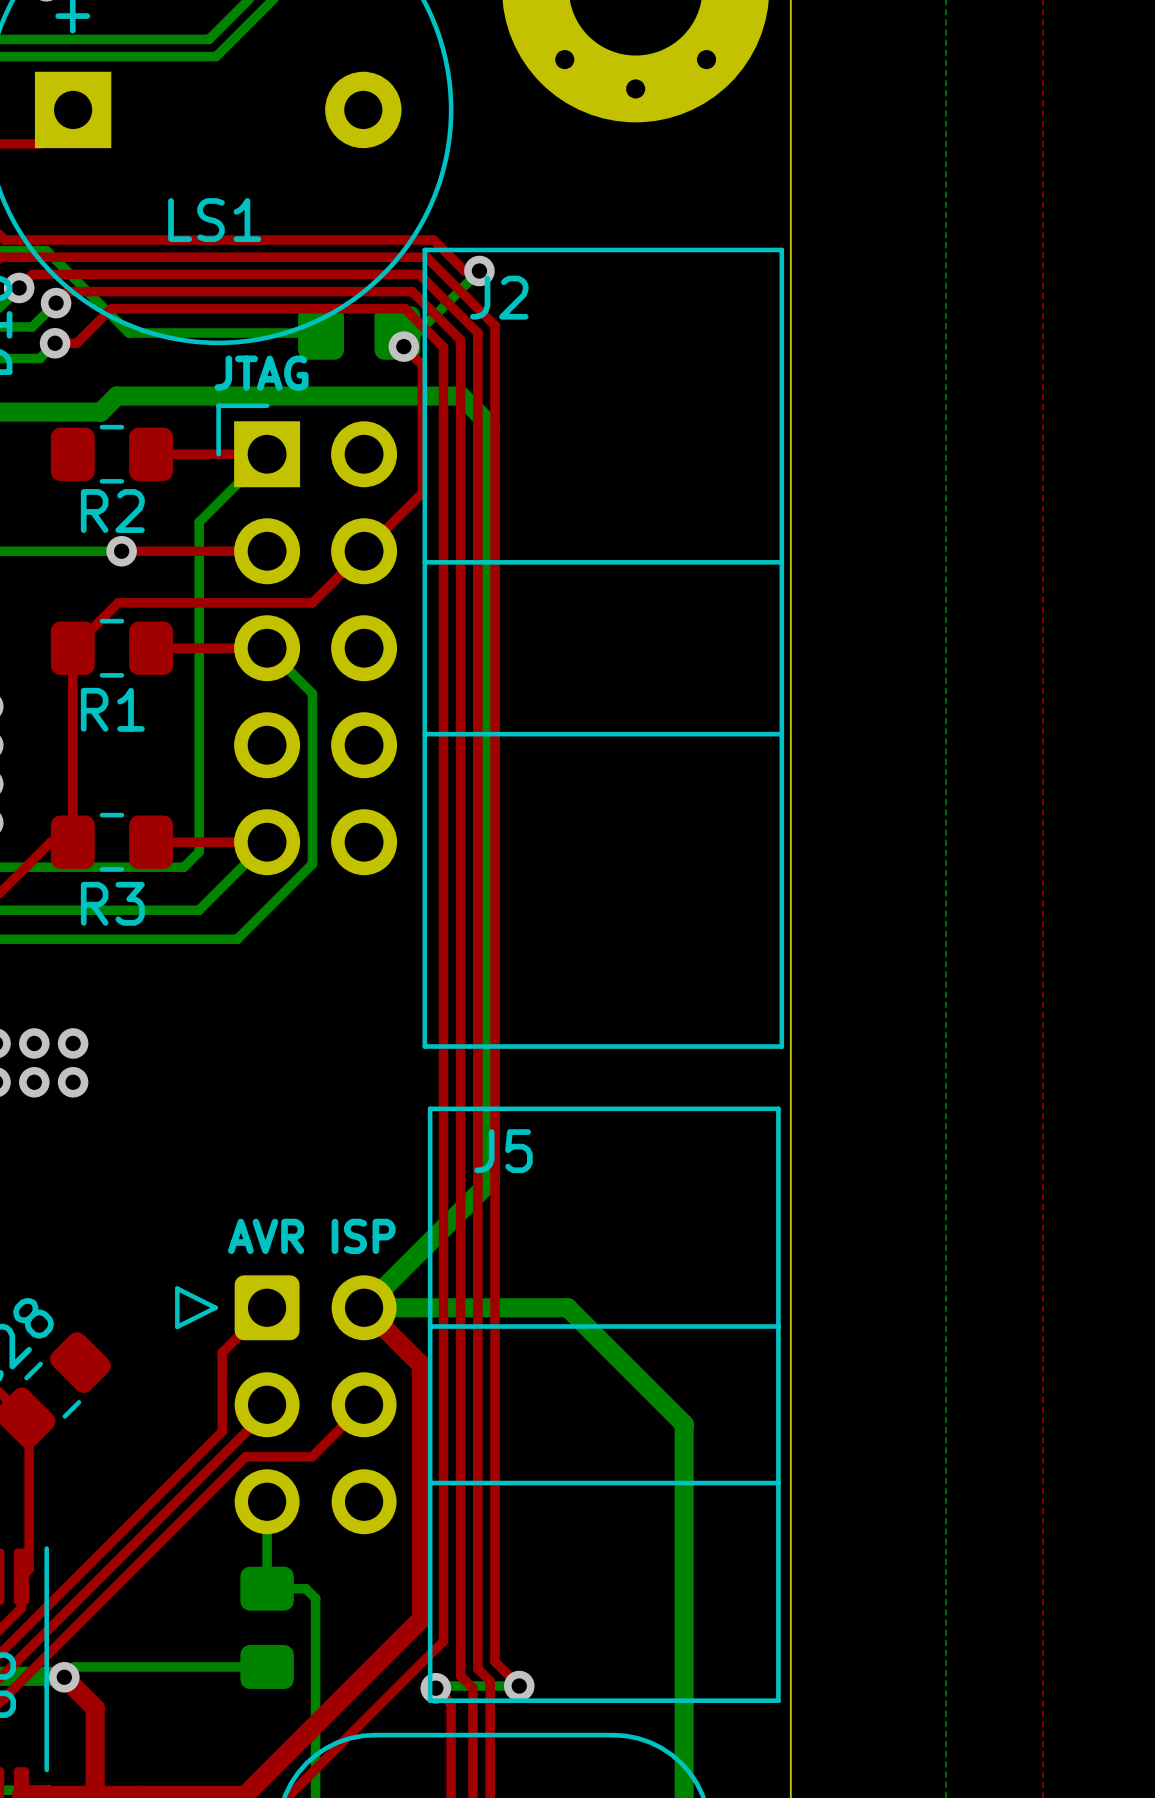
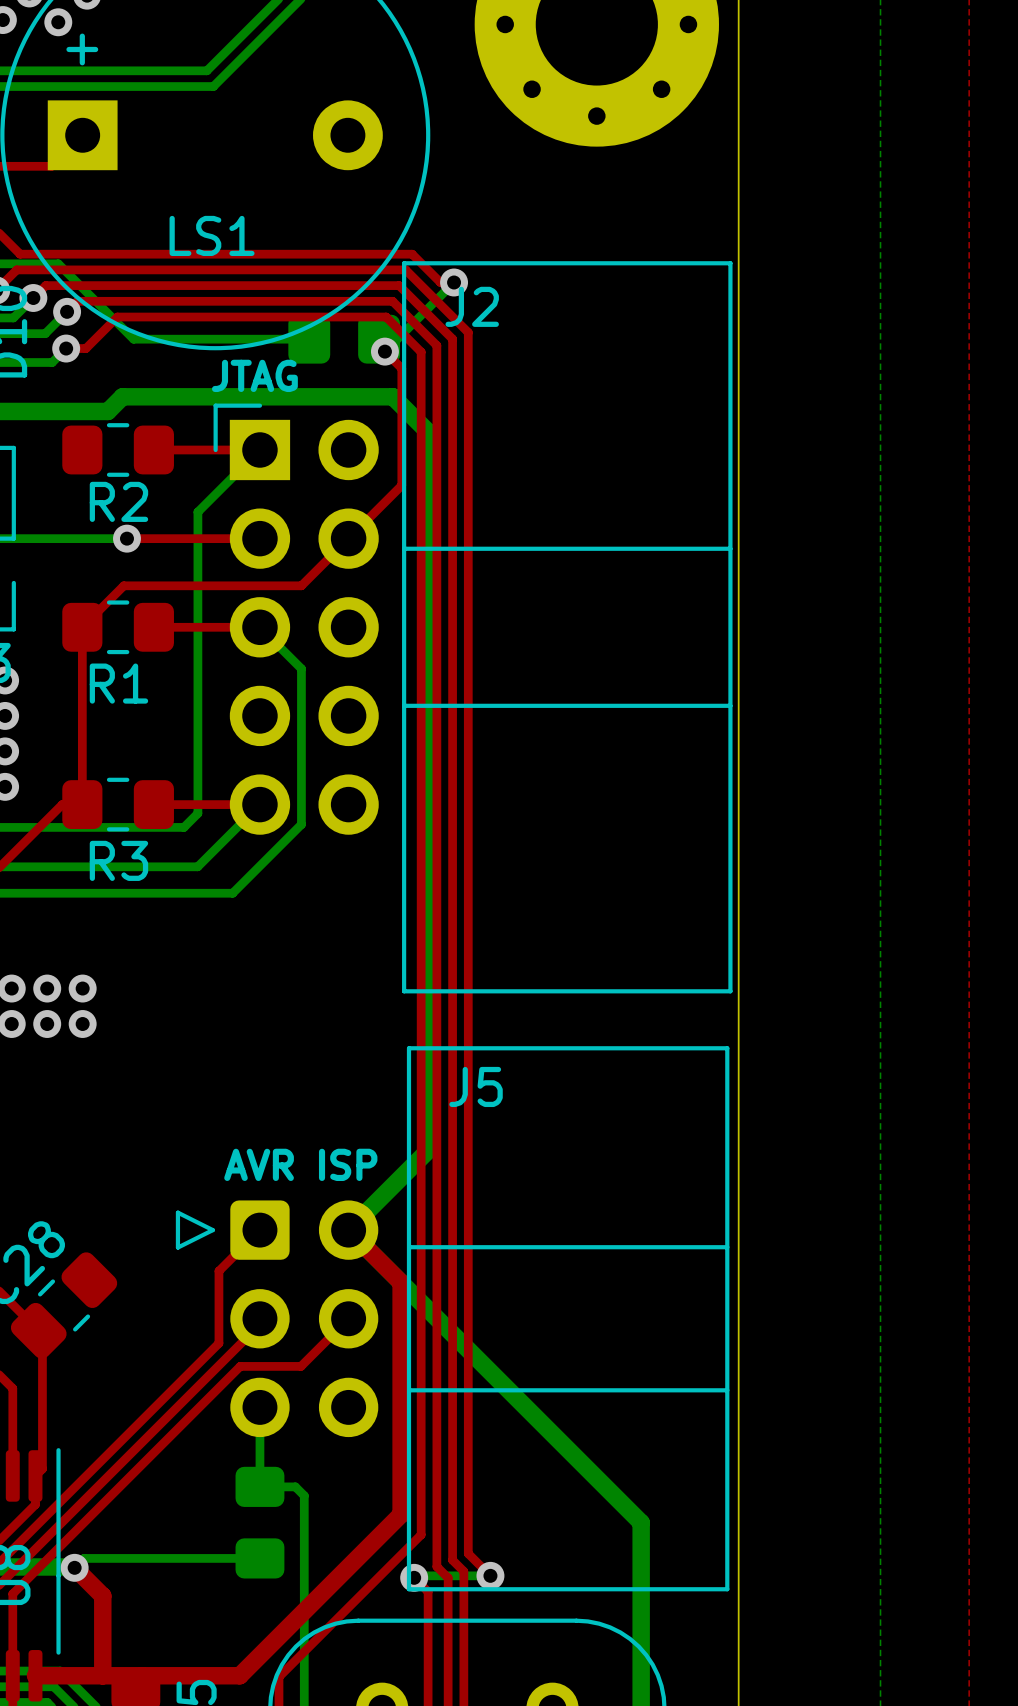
bottom track: (412, 396) (461, 396) (490, 425) (490, 1181) (451, 1220) -> (392, 396) (428, 432) (428, 1150)
bottom track: (364, 1307) (567, 1307) (684, 1424) (684, 1627) -> (348, 1230) (641, 1522)

